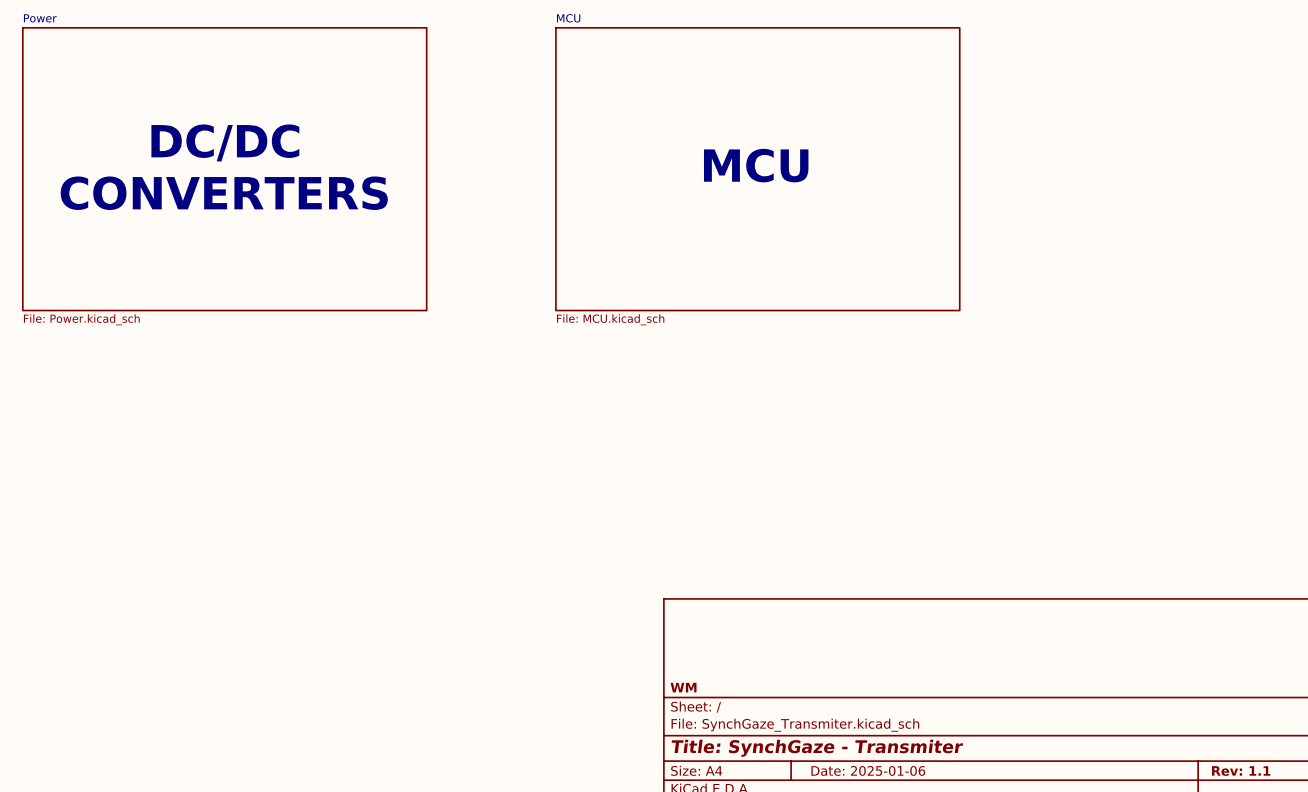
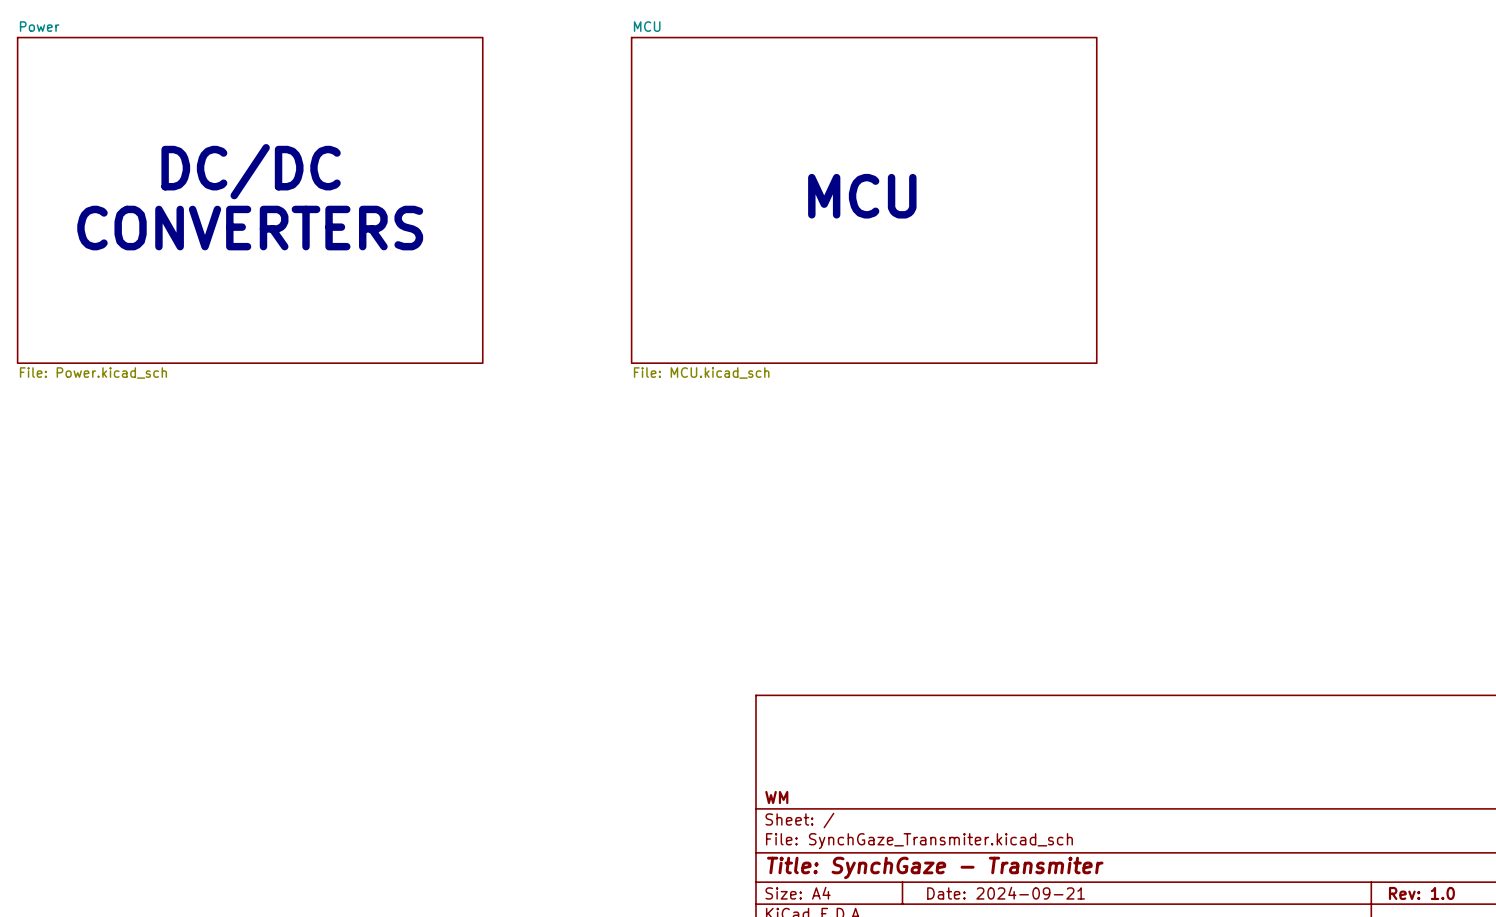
title block: Date: 2025-01-06 (868, 770) -> Date: 2024-09-21 (1006, 893)
title block: Rev: 1.1 (1241, 771) -> Rev: 1.0 (1421, 893)

